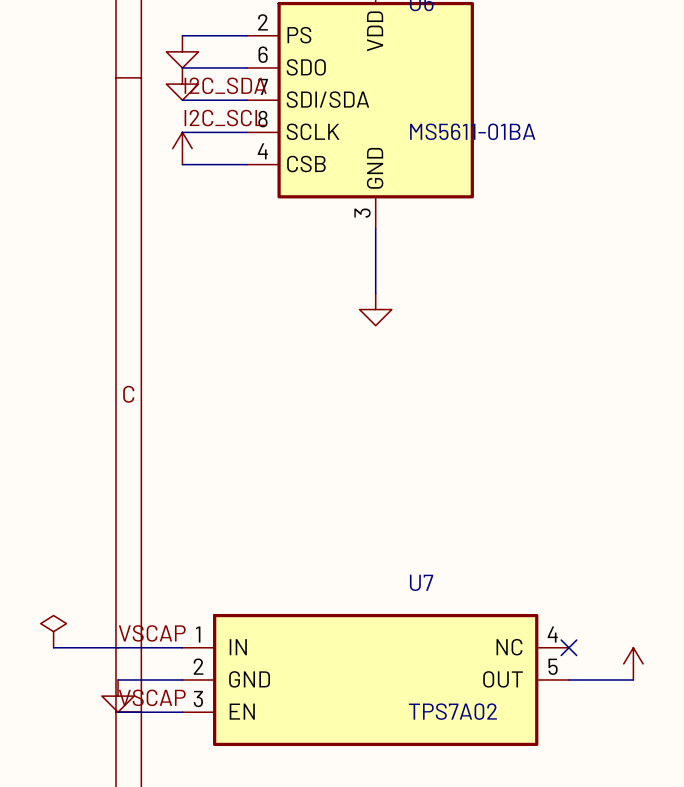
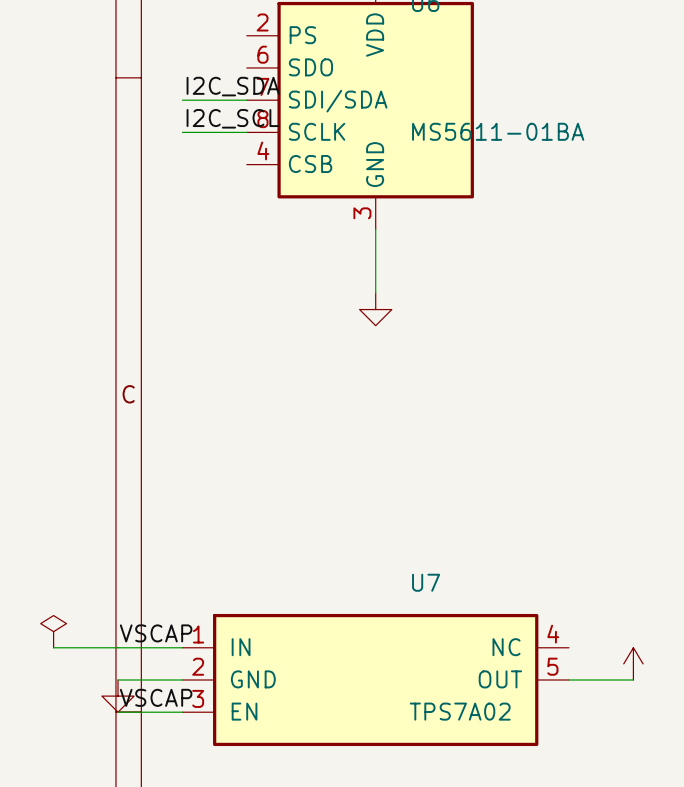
wire: (182, 35) (246, 35) -> none
power symbol: (182, 51) -> none
wire: (182, 67) (246, 67) -> none
power symbol: (182, 84) -> none
power symbol: (182, 148) -> none
wire: (182, 164) (246, 164) -> none
no-connect mark: (568, 647) -> none

